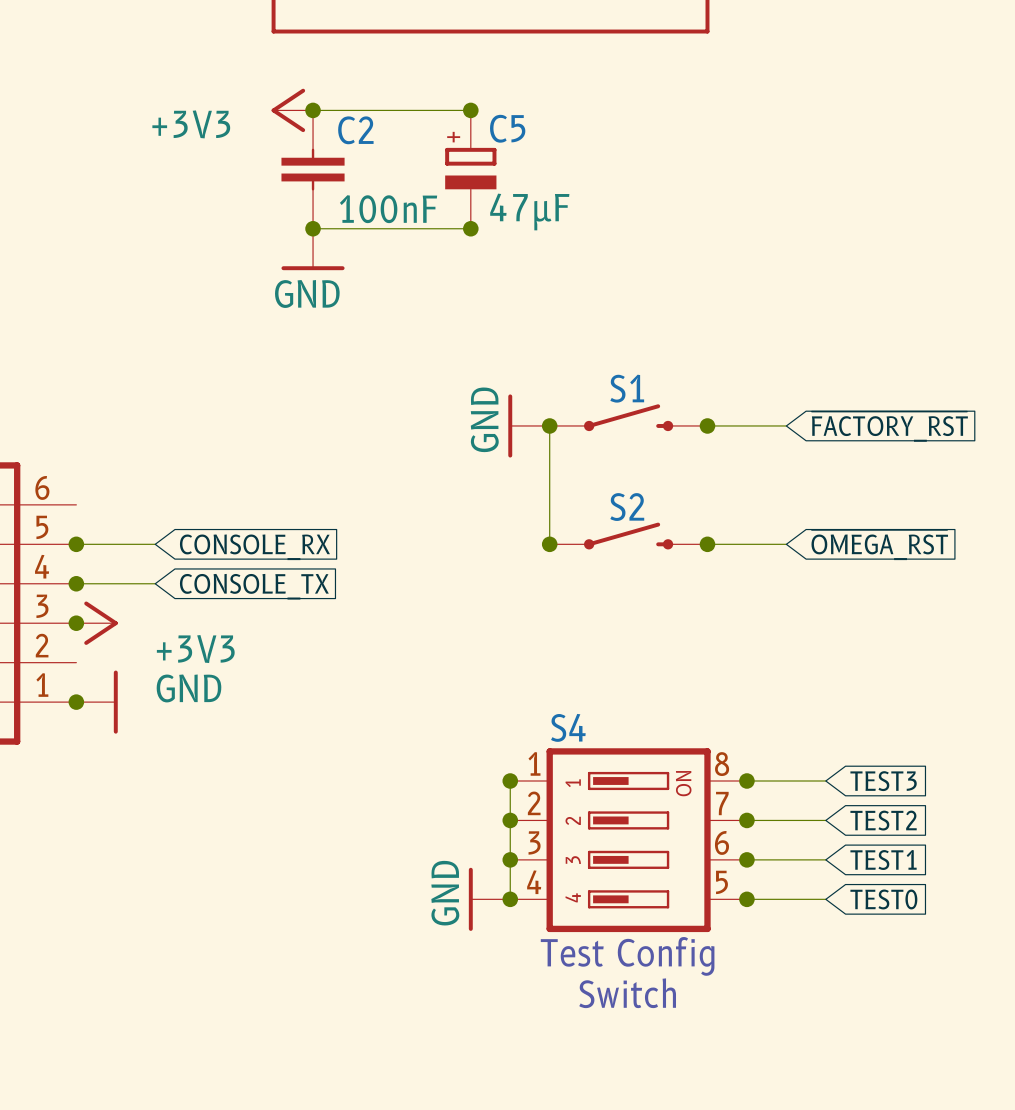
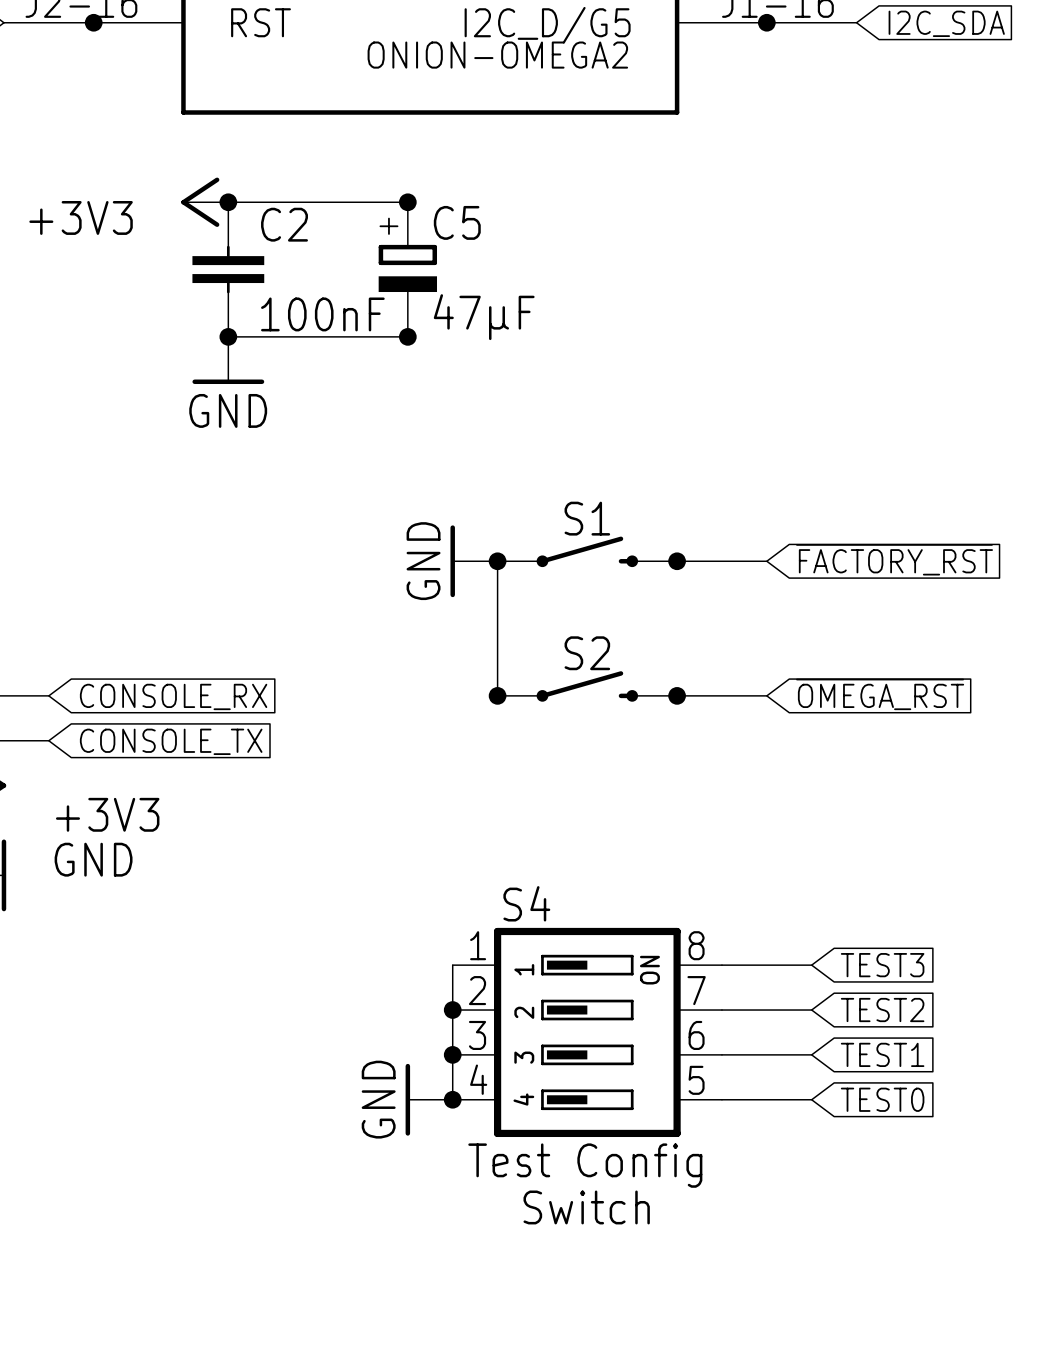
junction: (510, 781) -> none
junction: (746, 781) -> none
junction: (746, 820) -> none
junction: (746, 859) -> none
junction: (746, 899) -> none

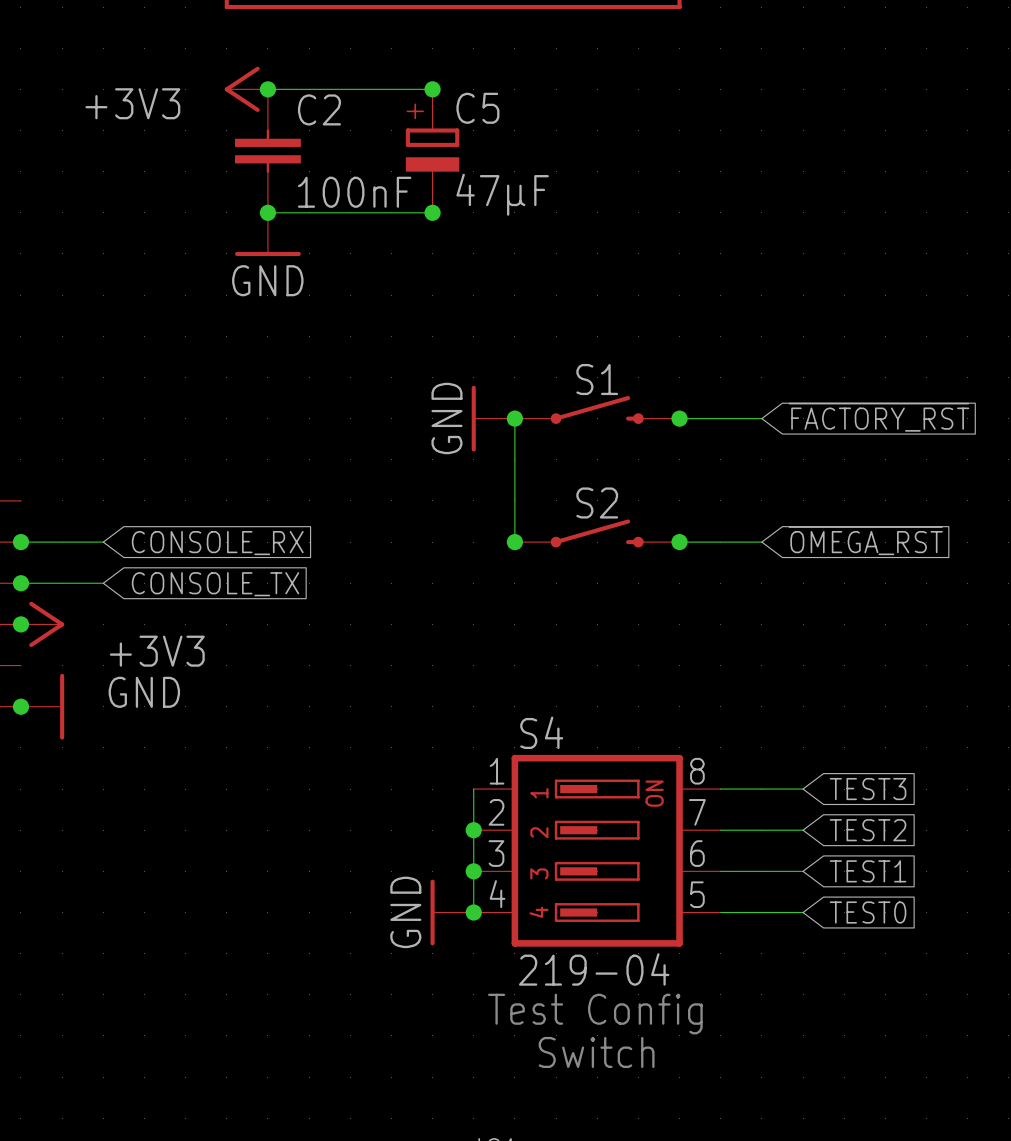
S4 value: none -> 219-04 (594, 969)
text: Test Config (585, 1165) -> none
text: Switch (586, 1207) -> Test Config (595, 1014)
text: none -> Switch (596, 1052)

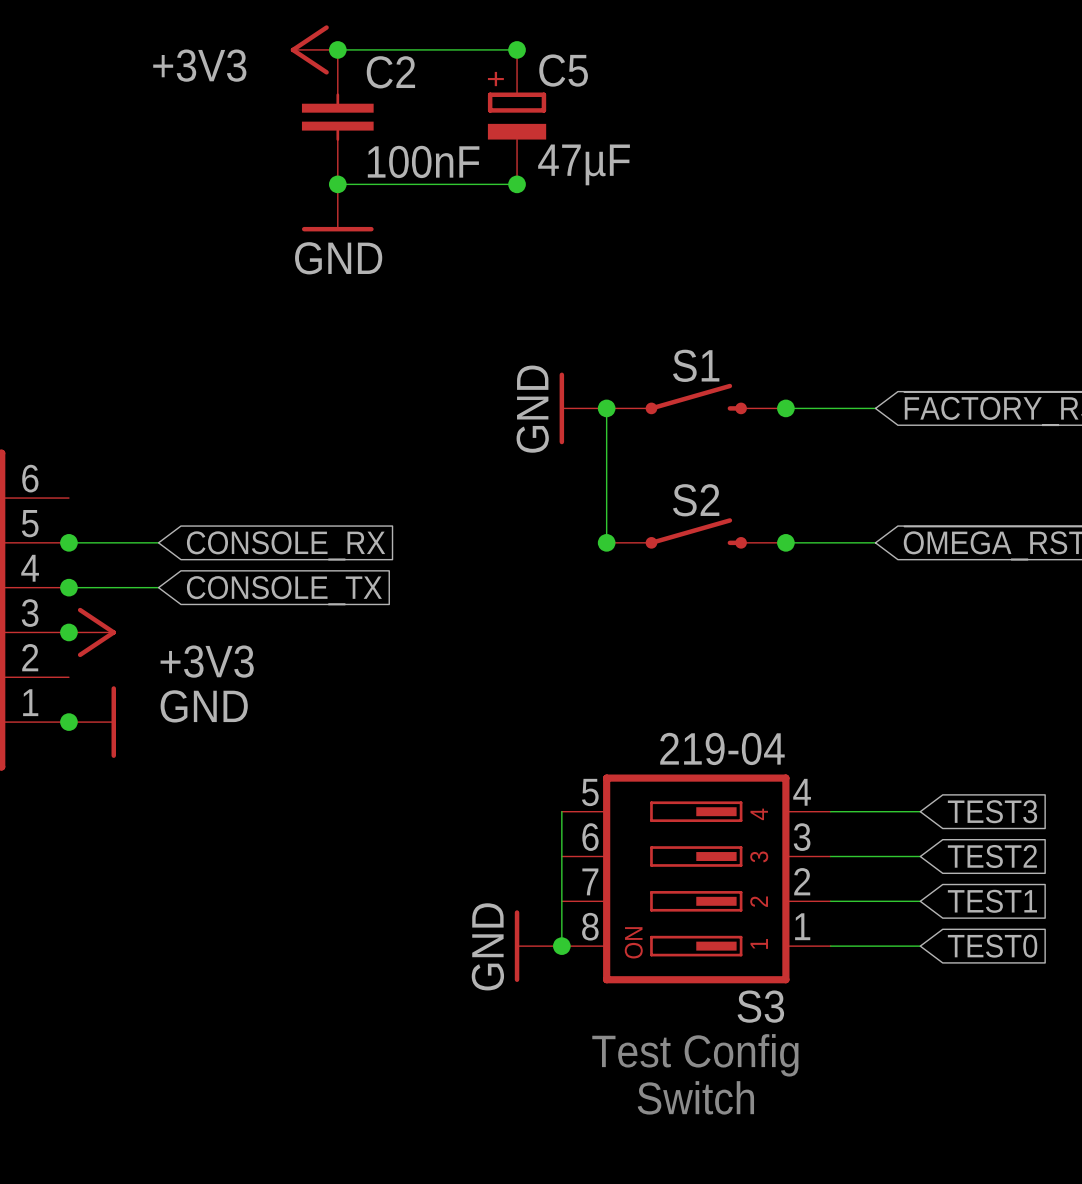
junction: (473, 830) -> none
S4: 219-04 (597, 850) -> none
S3: none -> 219-04 (696, 878)
junction: (473, 871) -> none

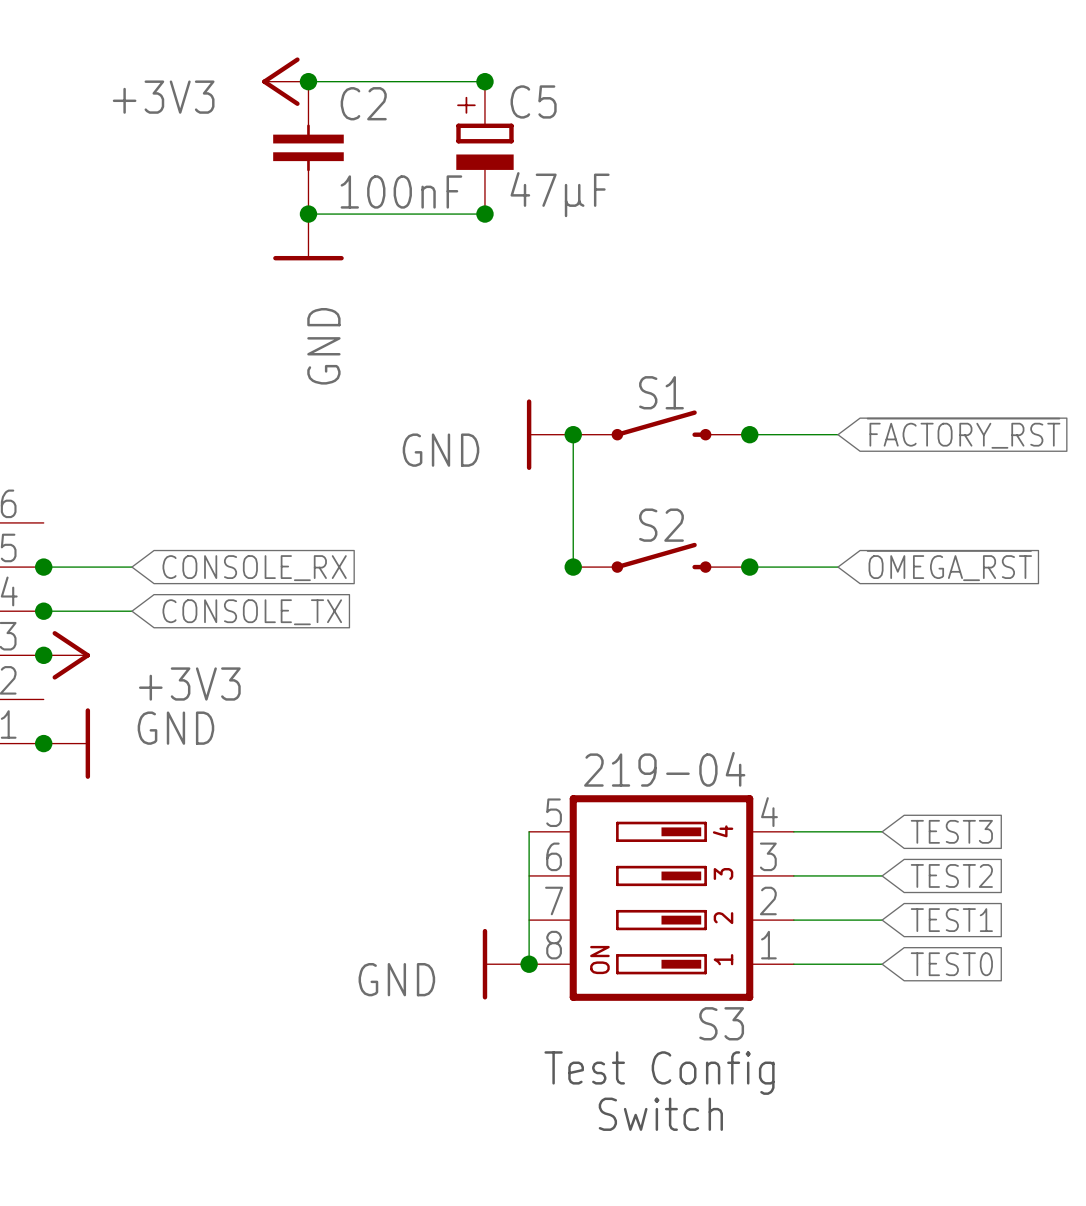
power symbol text rotation: 0° (338, 258) -> 90° counterclockwise (323, 346)
power symbol text rotation: 0° (532, 409) -> 90° clockwise (440, 450)
power symbol text rotation: 0° (487, 946) -> 90° clockwise (396, 979)

